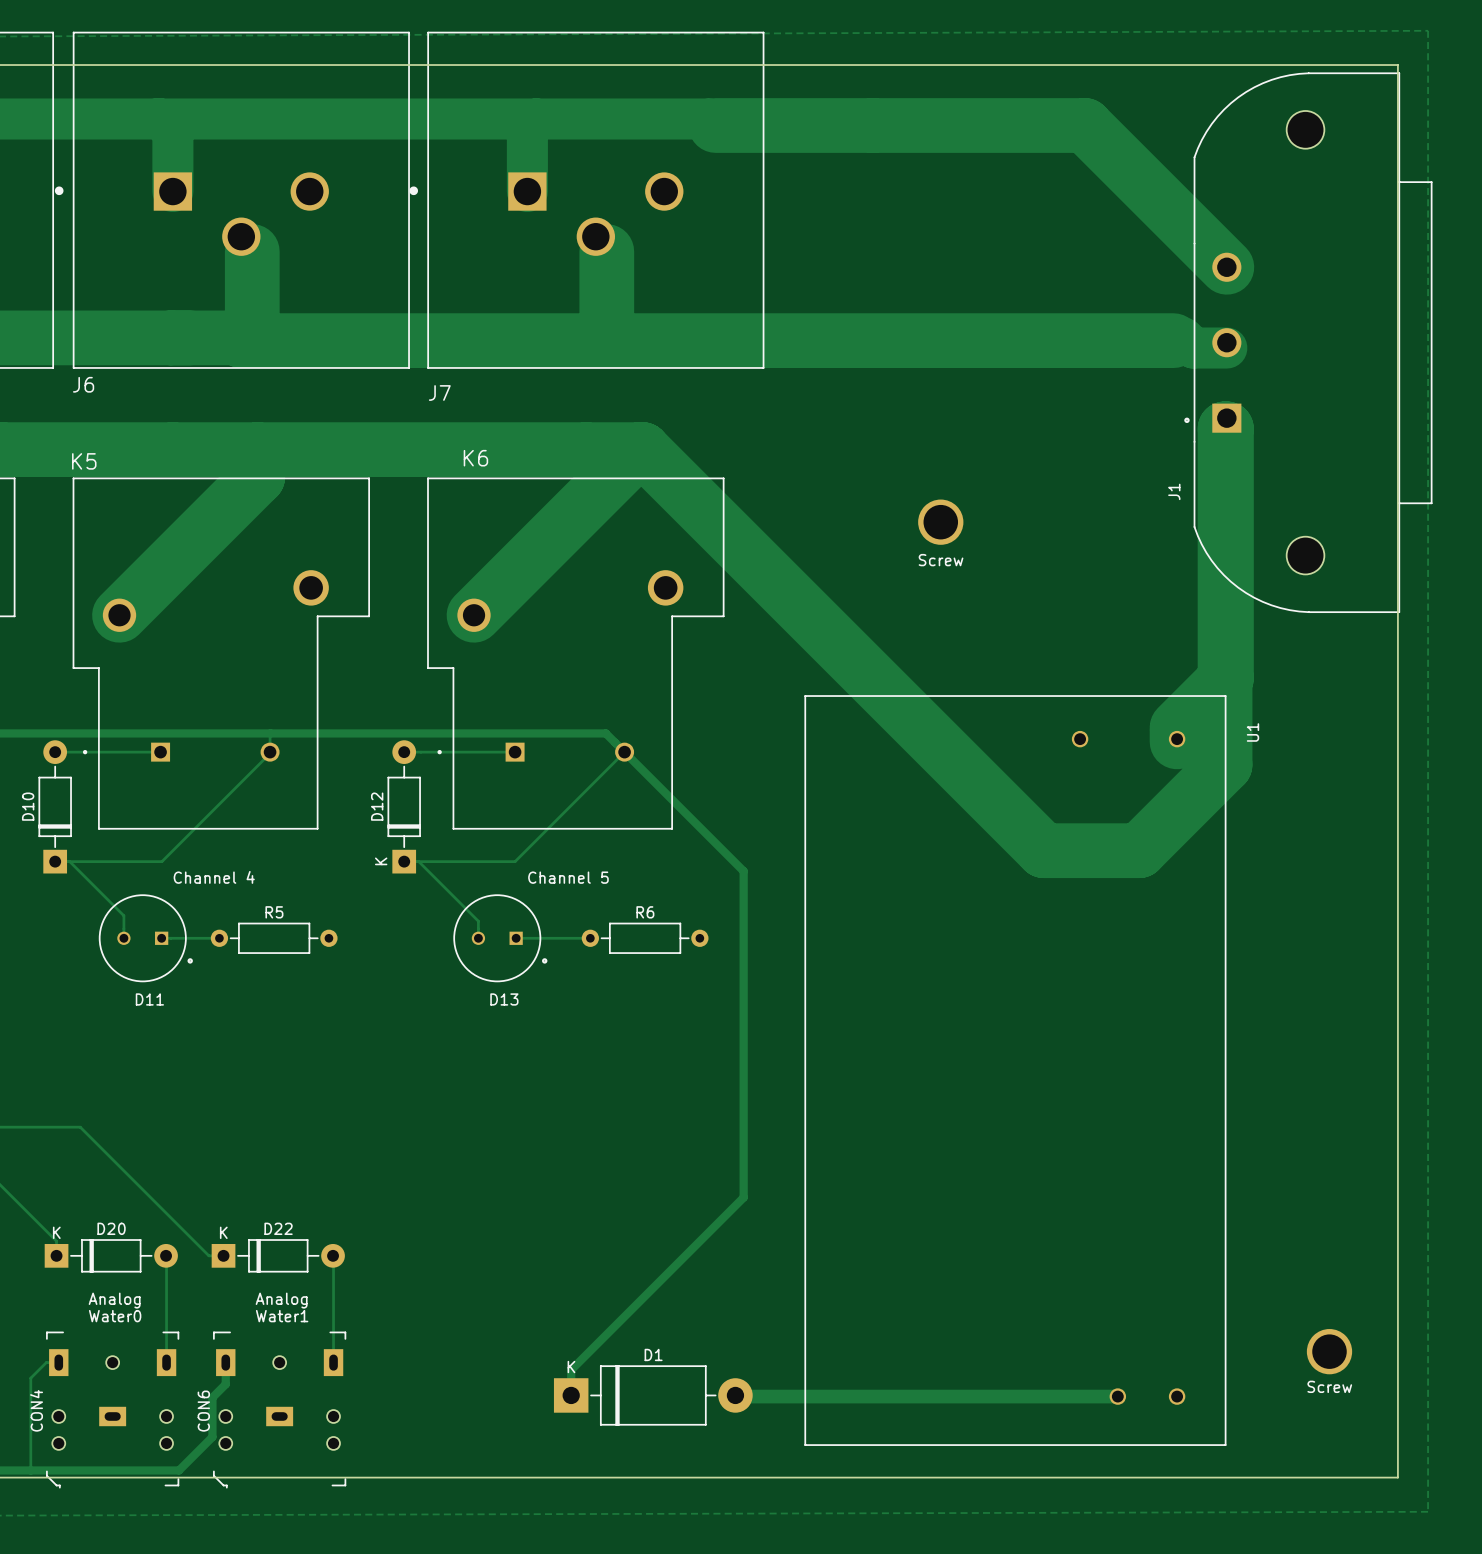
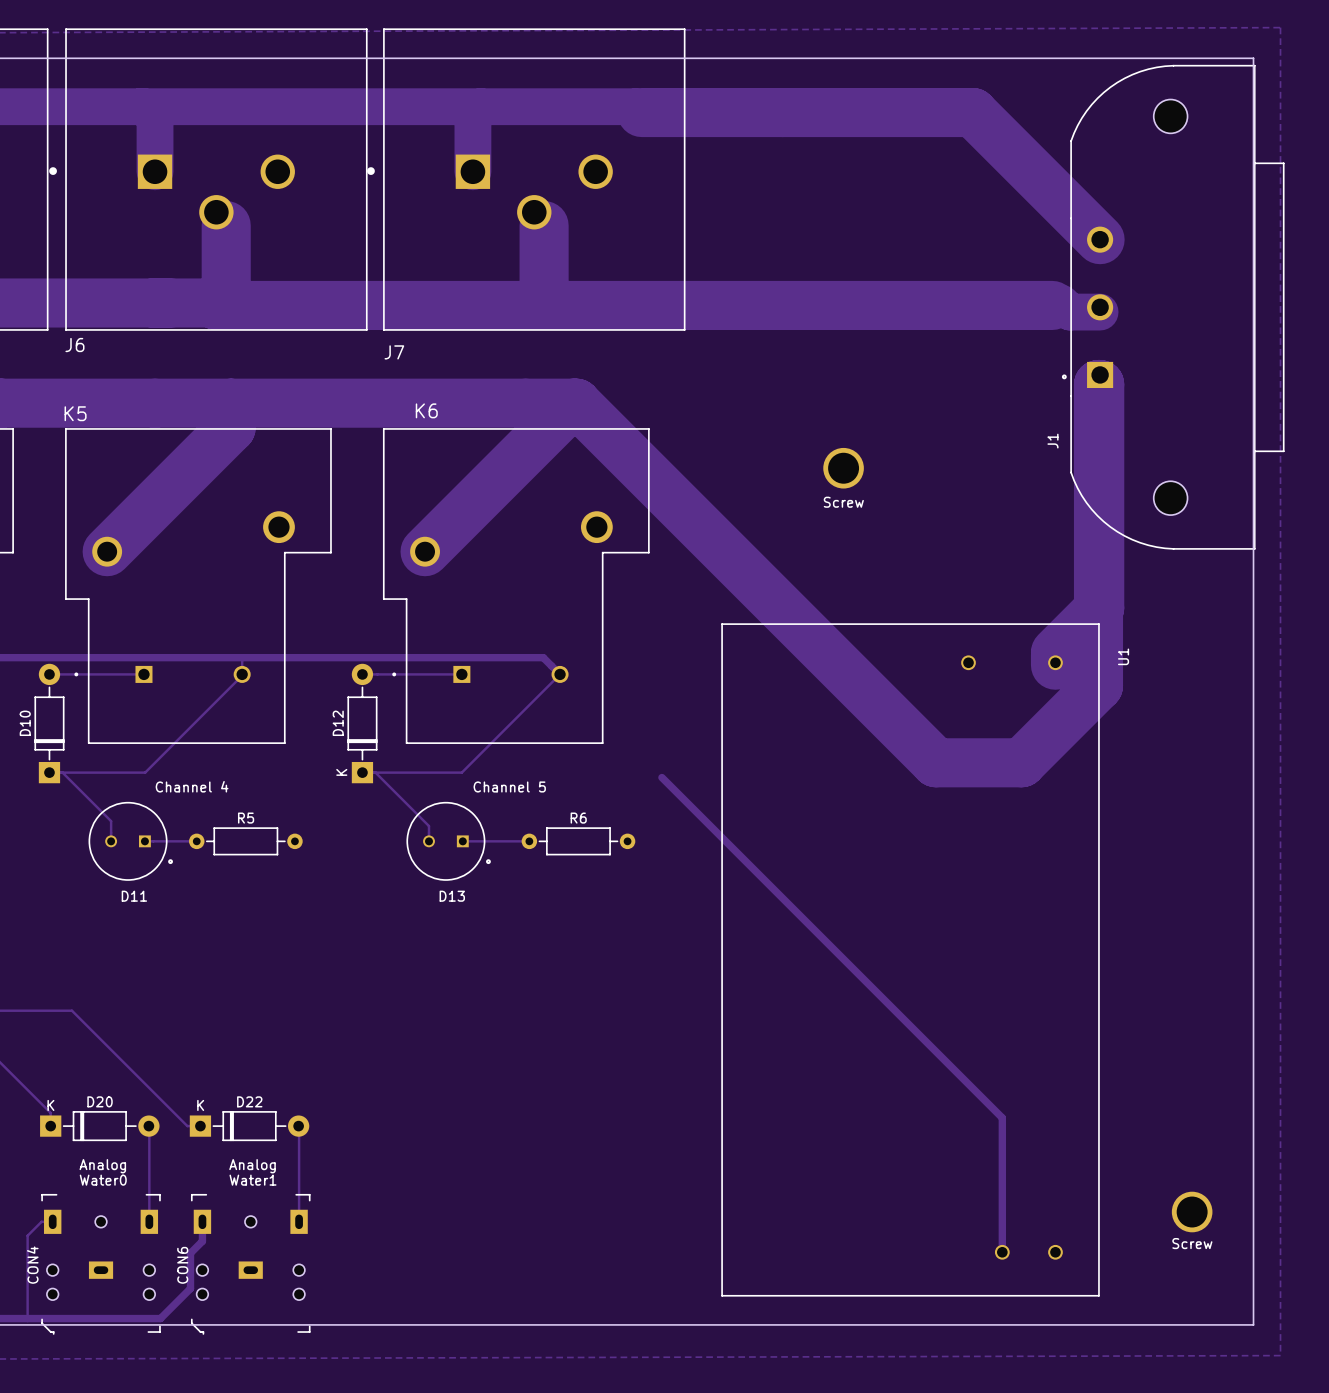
track: (625, 753) (743, 871) (743, 1197) (571, 1370) (571, 1395) -> none
D1: (653, 1395) -> none
track: (735, 1395) (1117, 1396) -> (661, 777) (1002, 1117) (1002, 1252)

